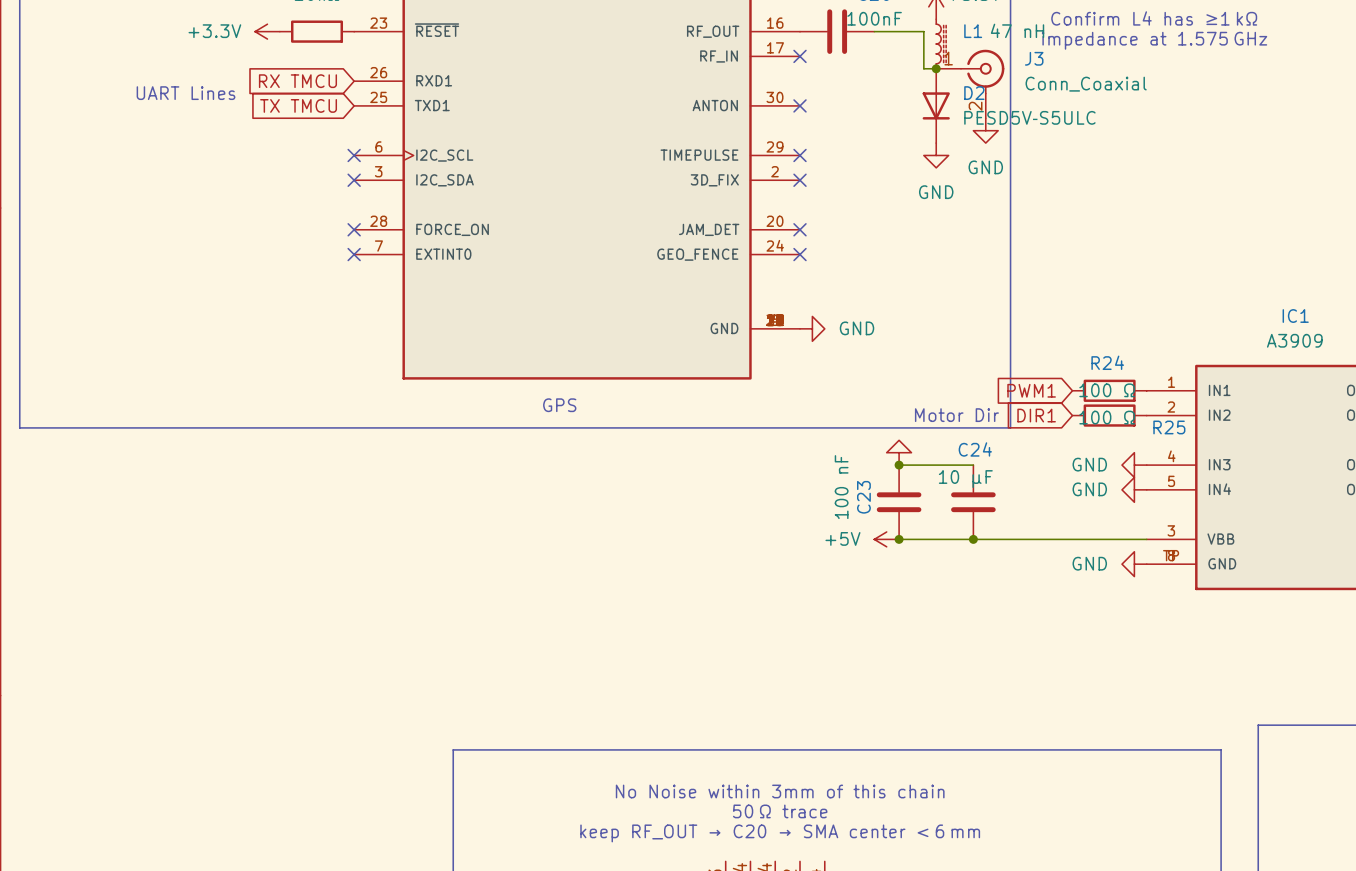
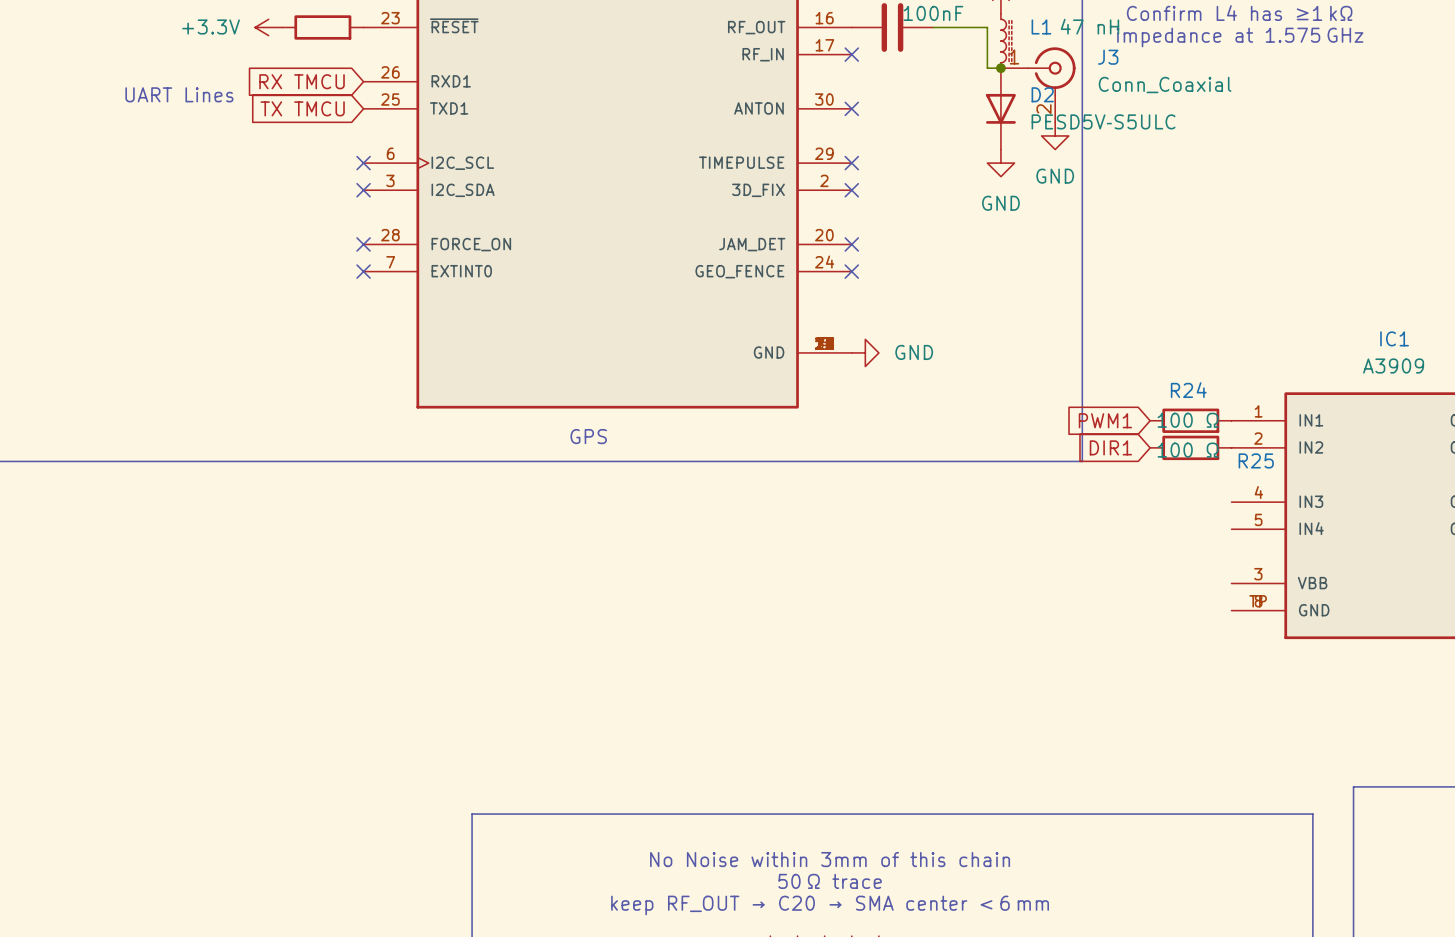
text: Motor Dir (956, 415) -> none
power symbol: (899, 452) -> none
wire: (899, 465) (973, 465) -> none
junction: (899, 465) -> none
power symbol: GND (1134, 465) -> none
power symbol: GND (1134, 489) -> none
C23: 100 nF (899, 502) -> none
C24: 10 µF (973, 502) -> none
power symbol: +5V (886, 539) -> none
wire: (899, 539) (1146, 539) -> none
junction: (899, 539) -> none
junction: (973, 539) -> none
power symbol: GND (1134, 564) -> none

